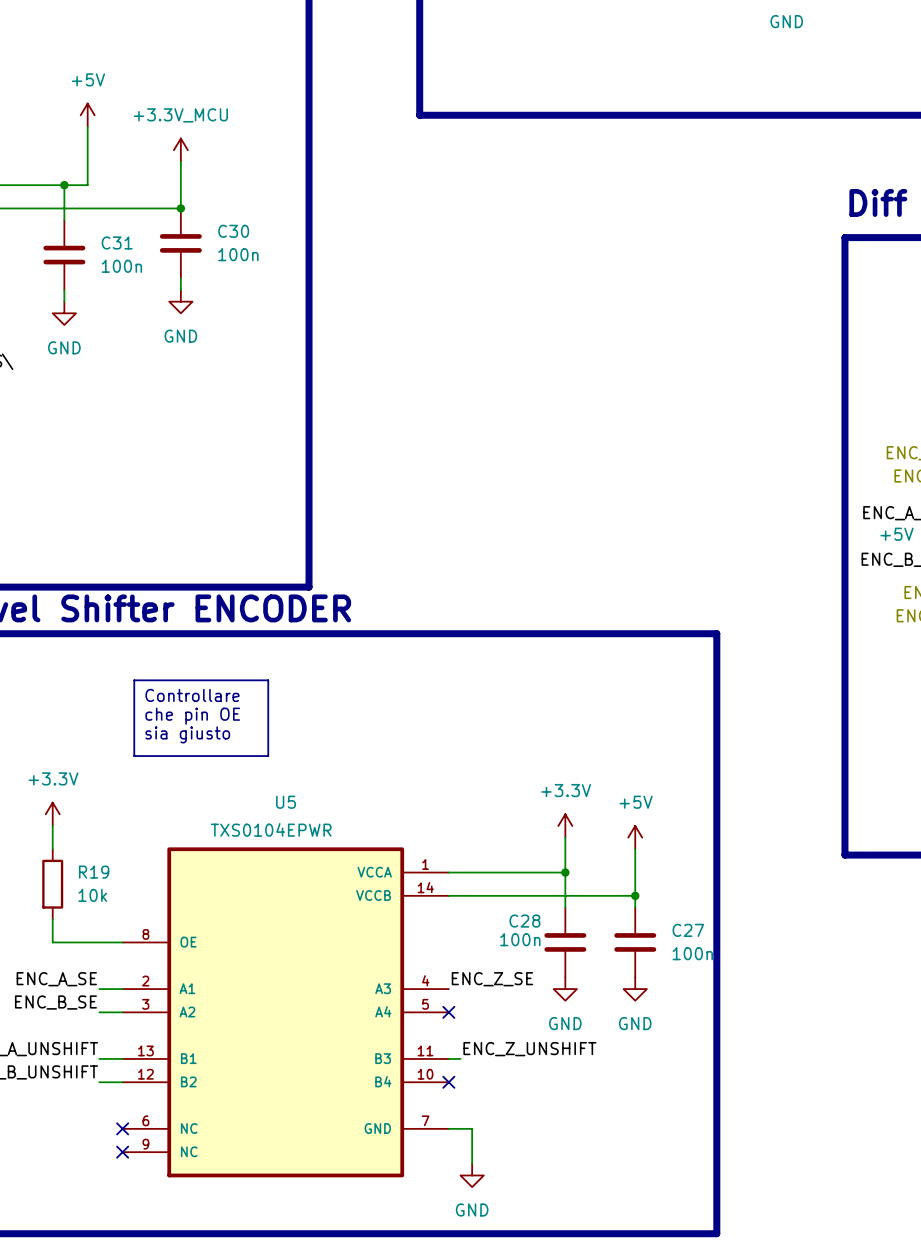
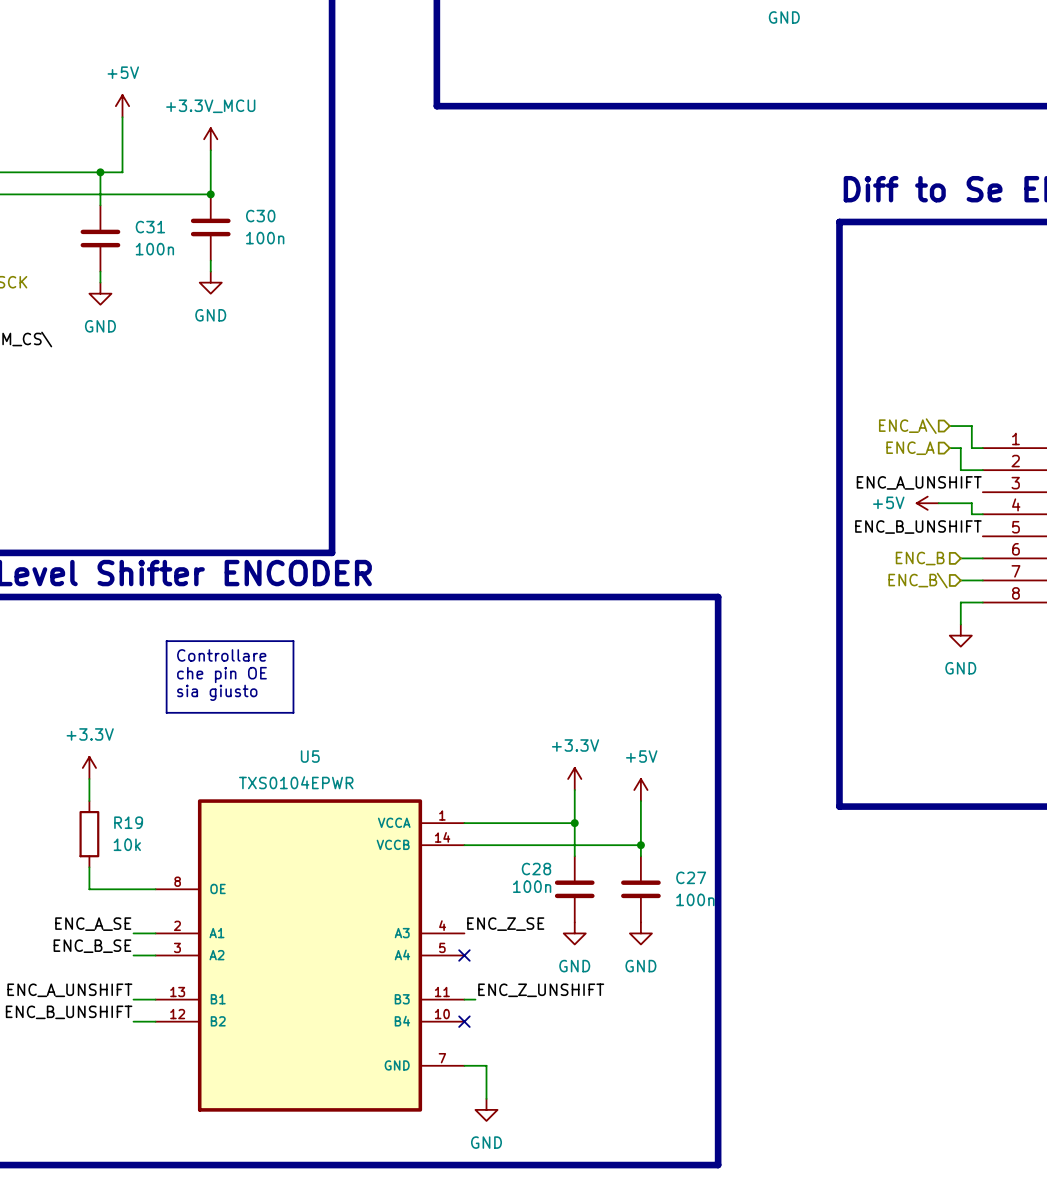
U5 symbol: [122, 847, 449, 1178] -> [155, 799, 465, 1112]
no-connect mark: (122, 1128) -> none
no-connect mark: (122, 1152) -> none

